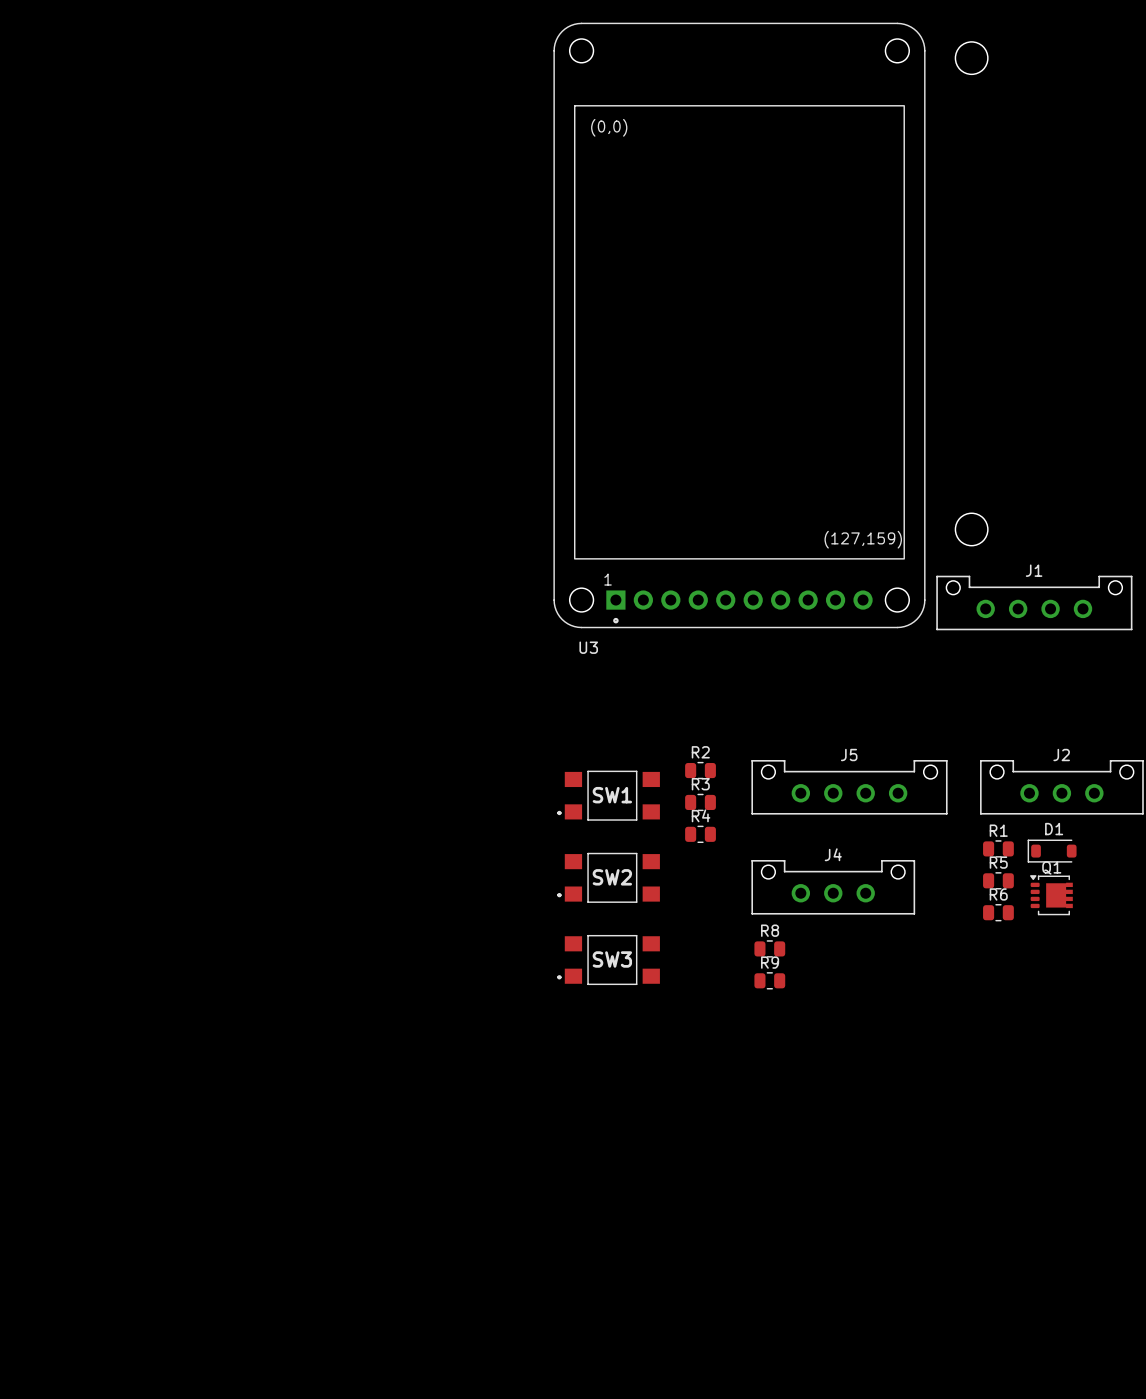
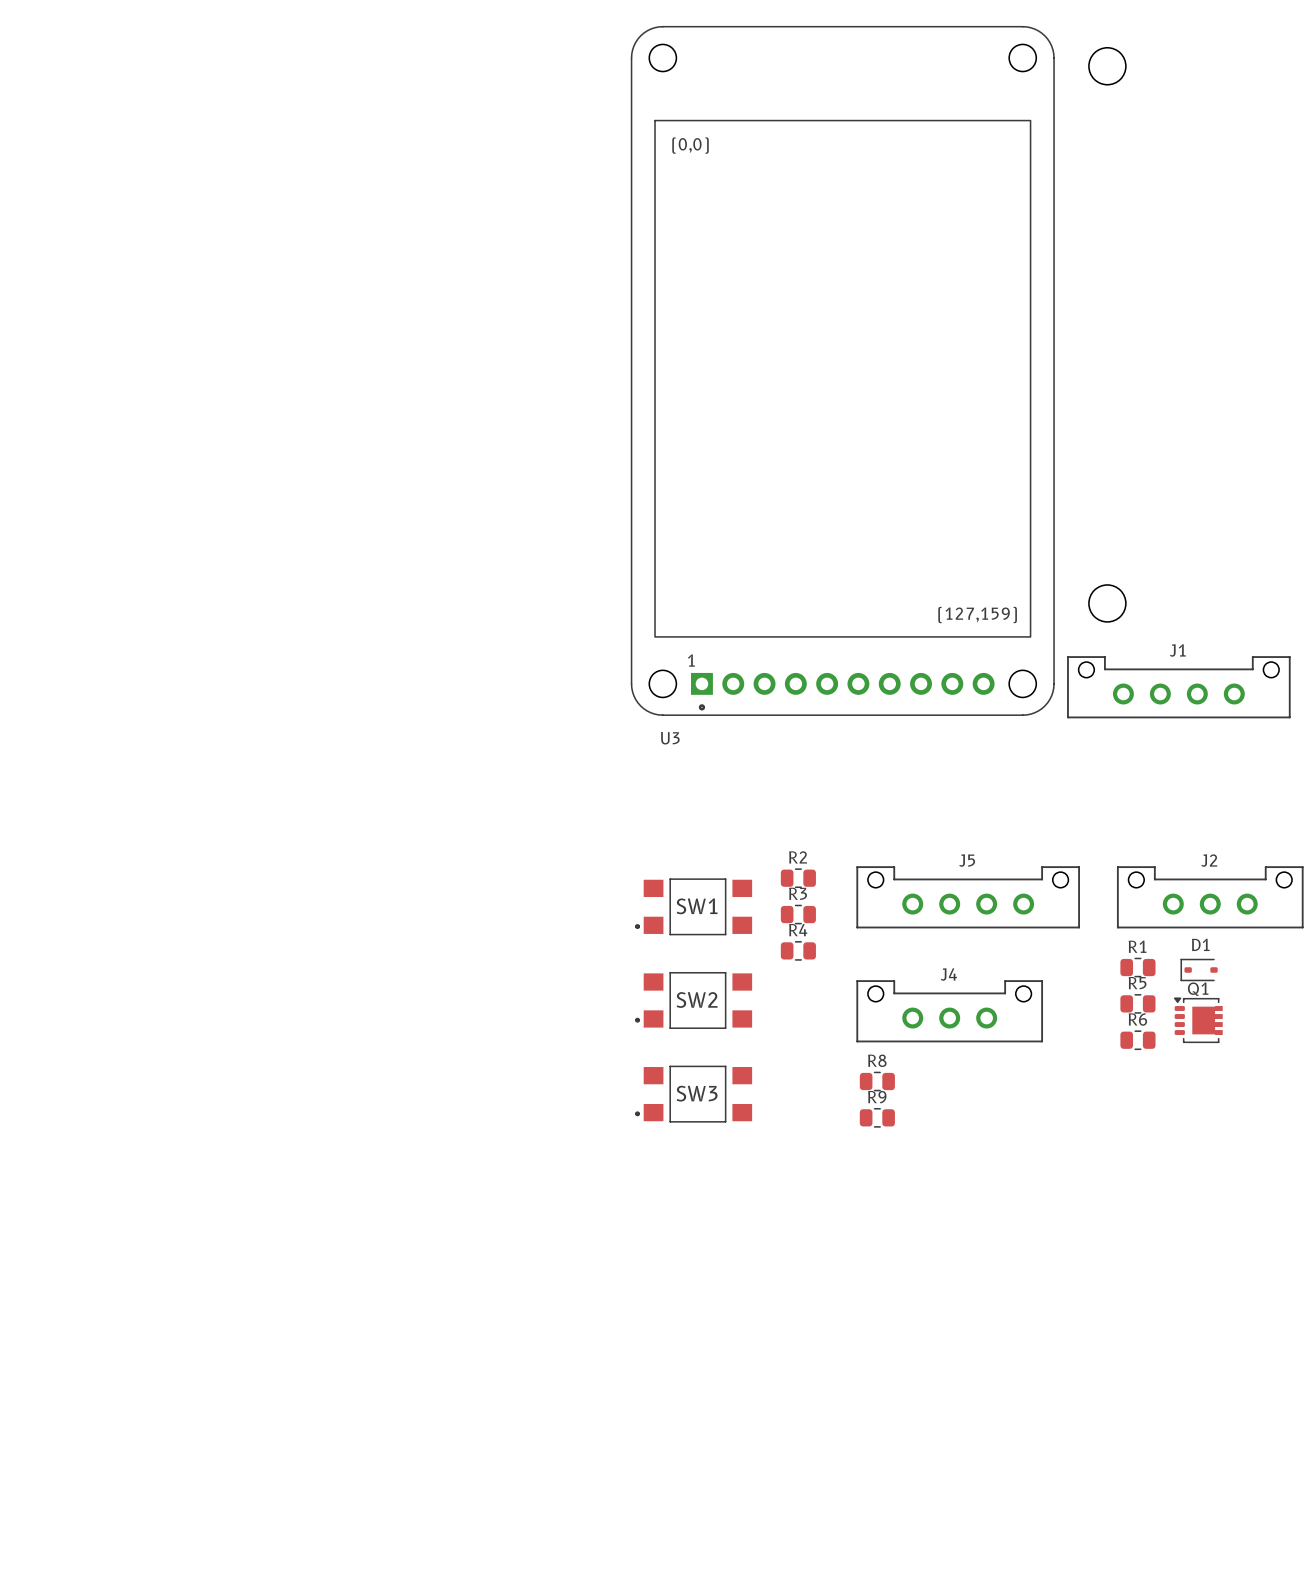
D1 footprint: [1027, 839, 1077, 863] -> [1180, 958, 1218, 982]

